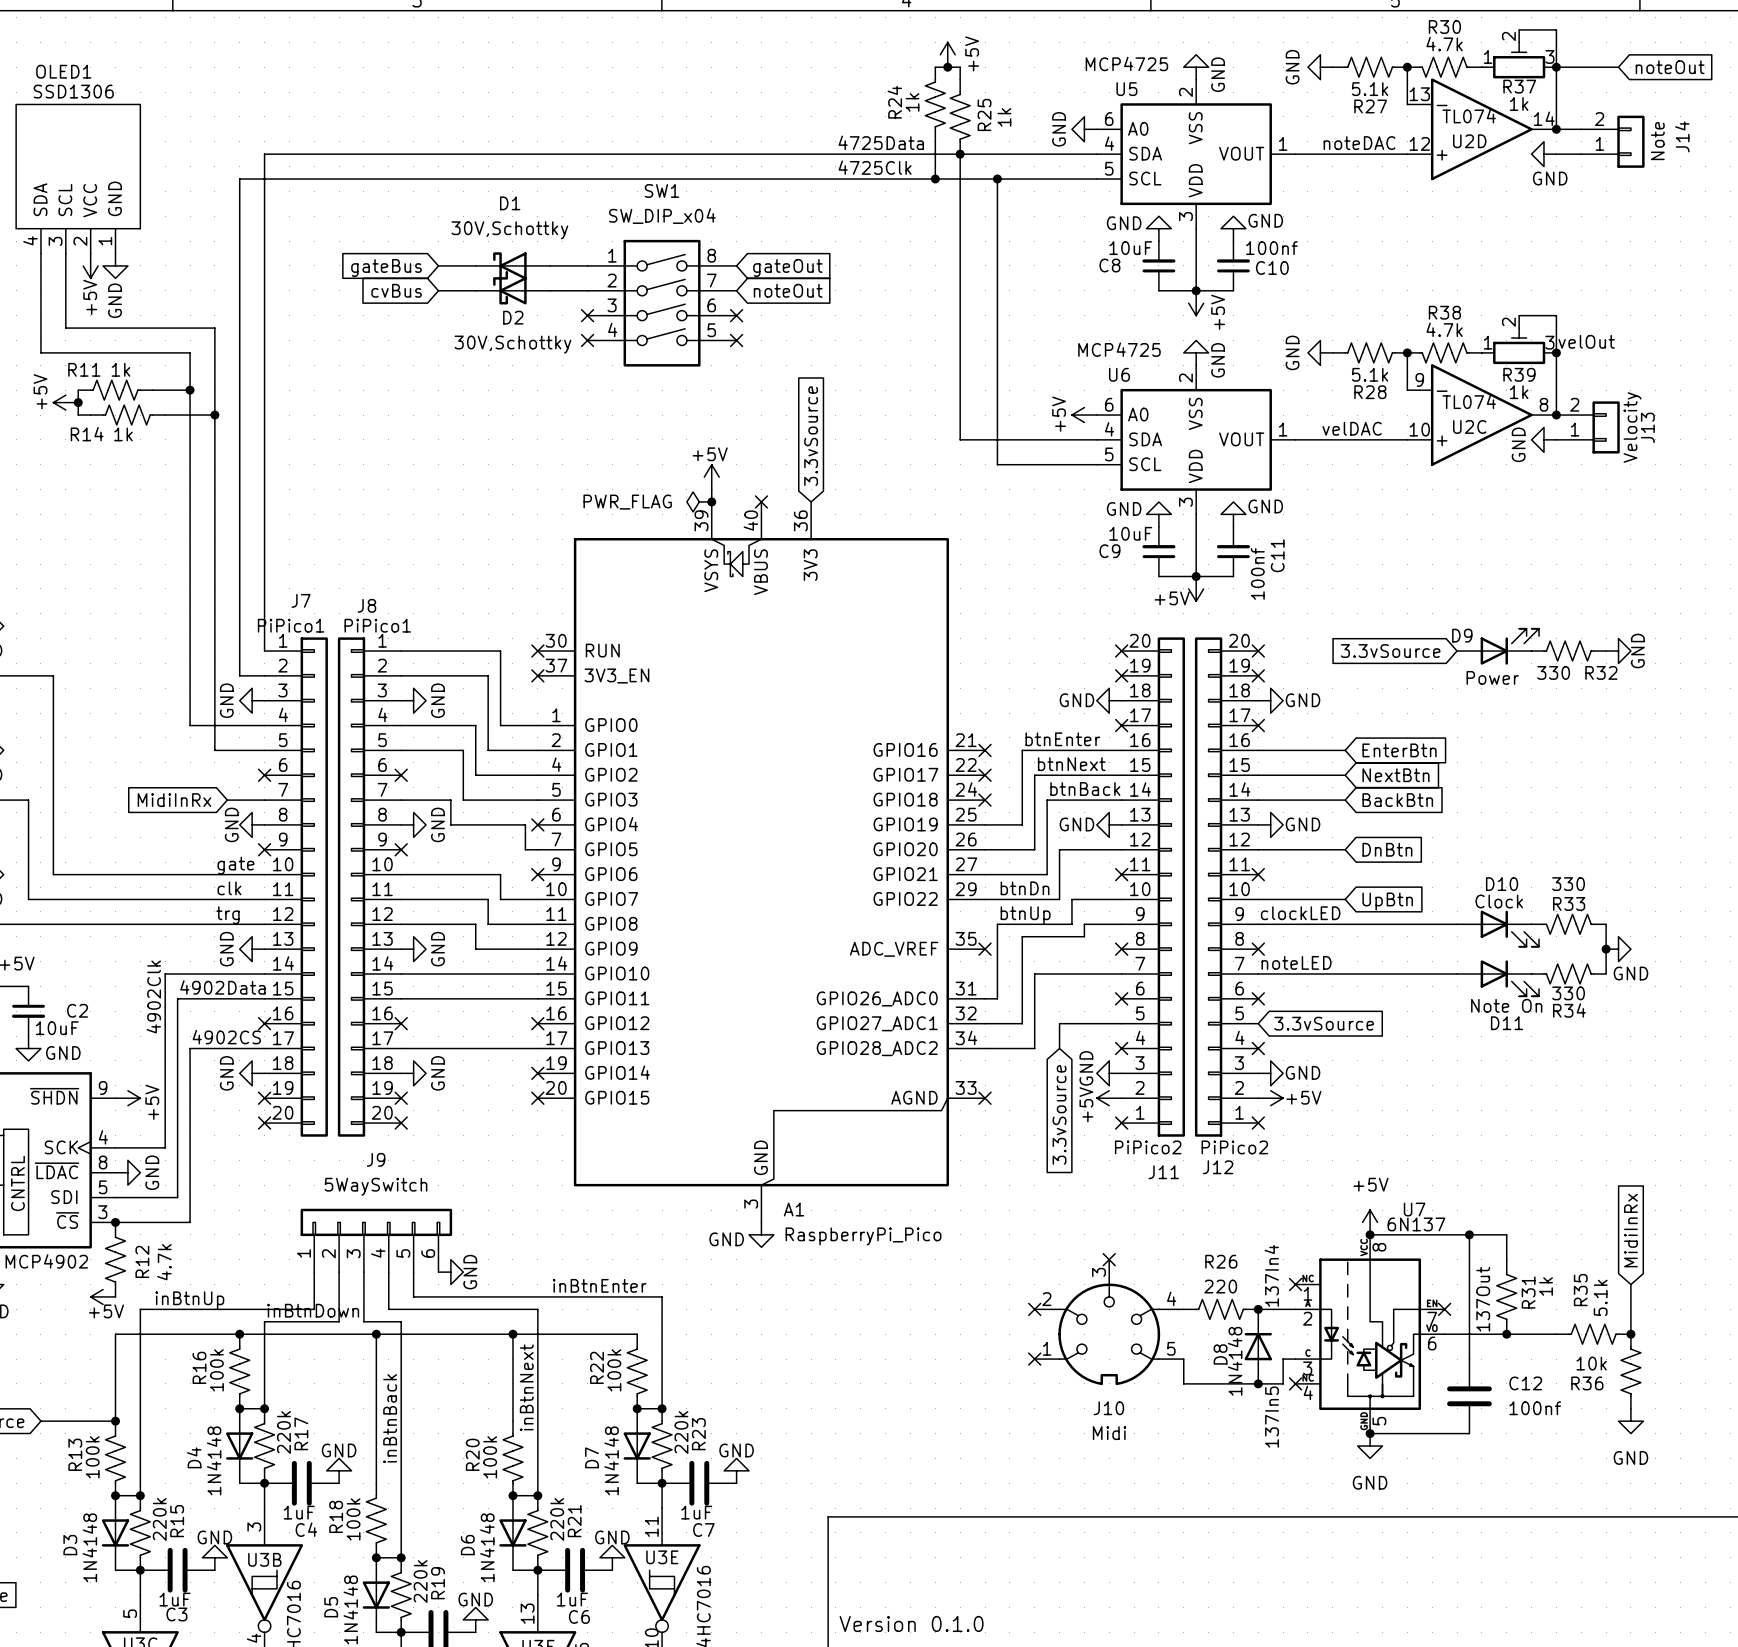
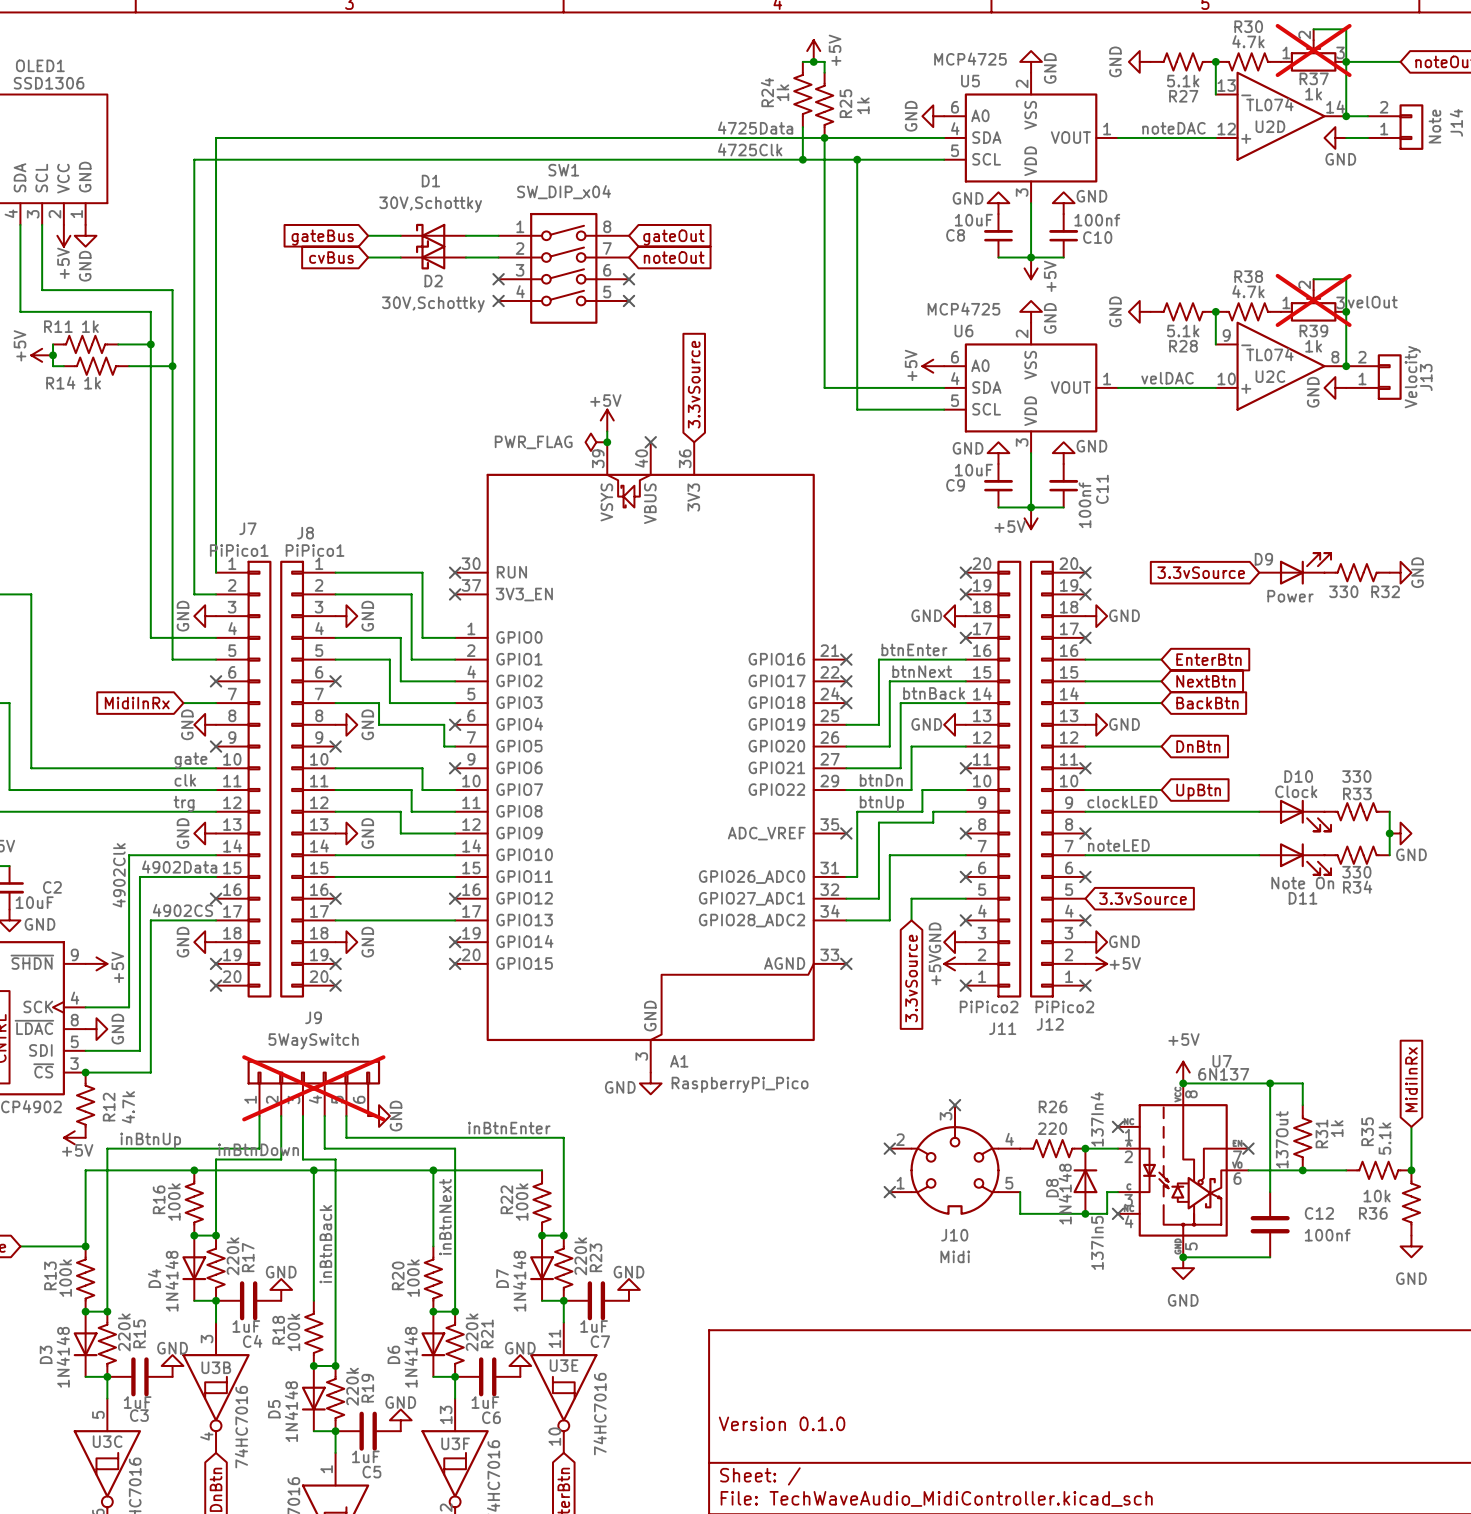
R37 do-not-place cross: none -> (1313, 50)
R39 do-not-place cross: none -> (1313, 300)
J9 do-not-place cross: none -> (313, 1088)

